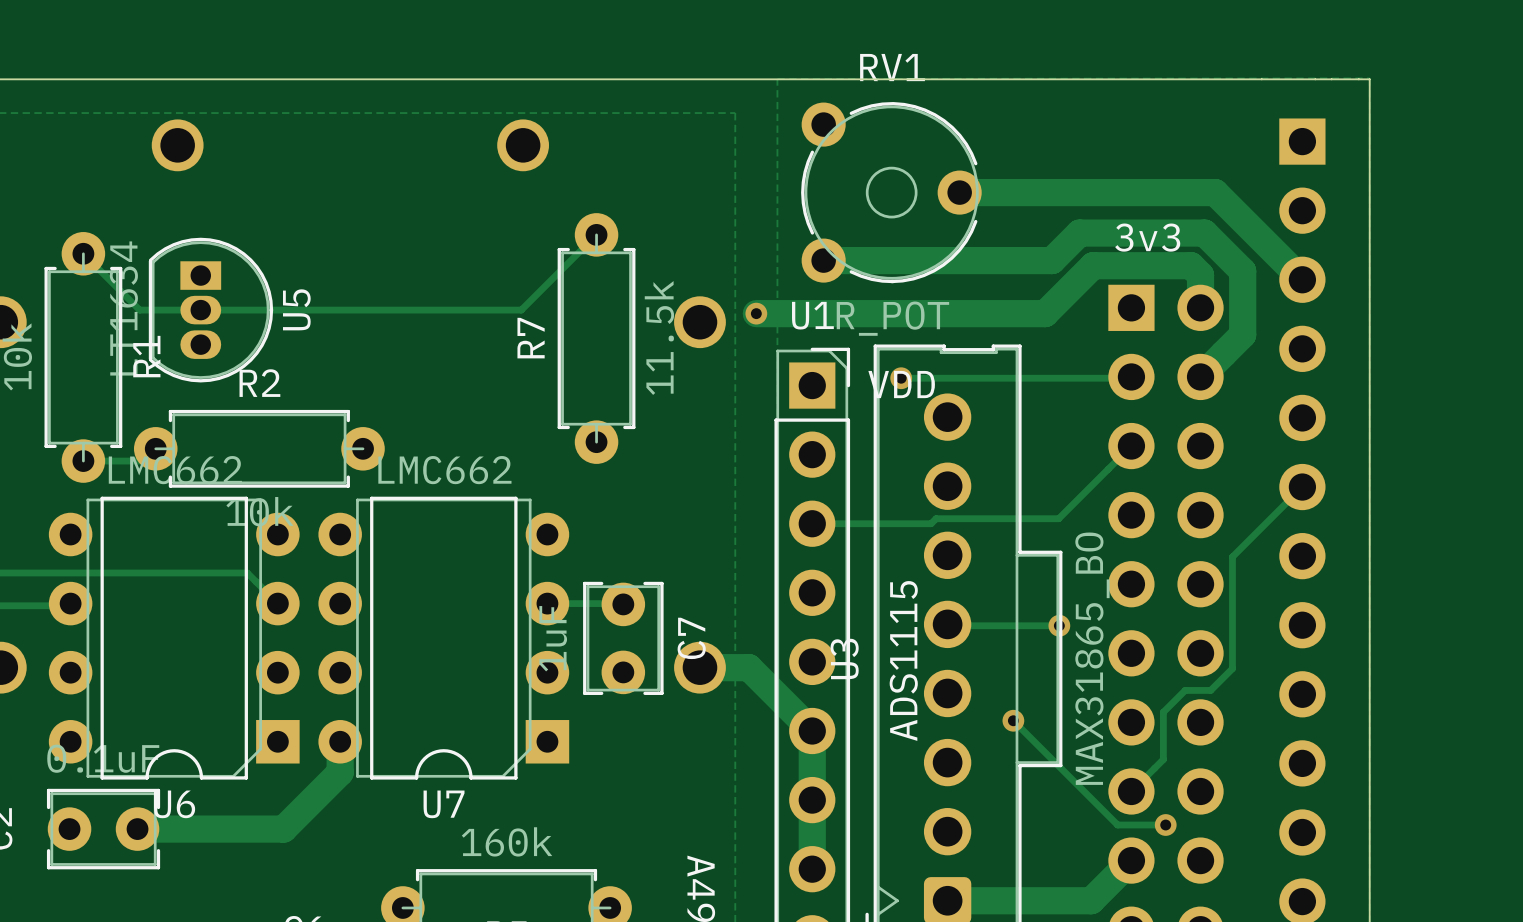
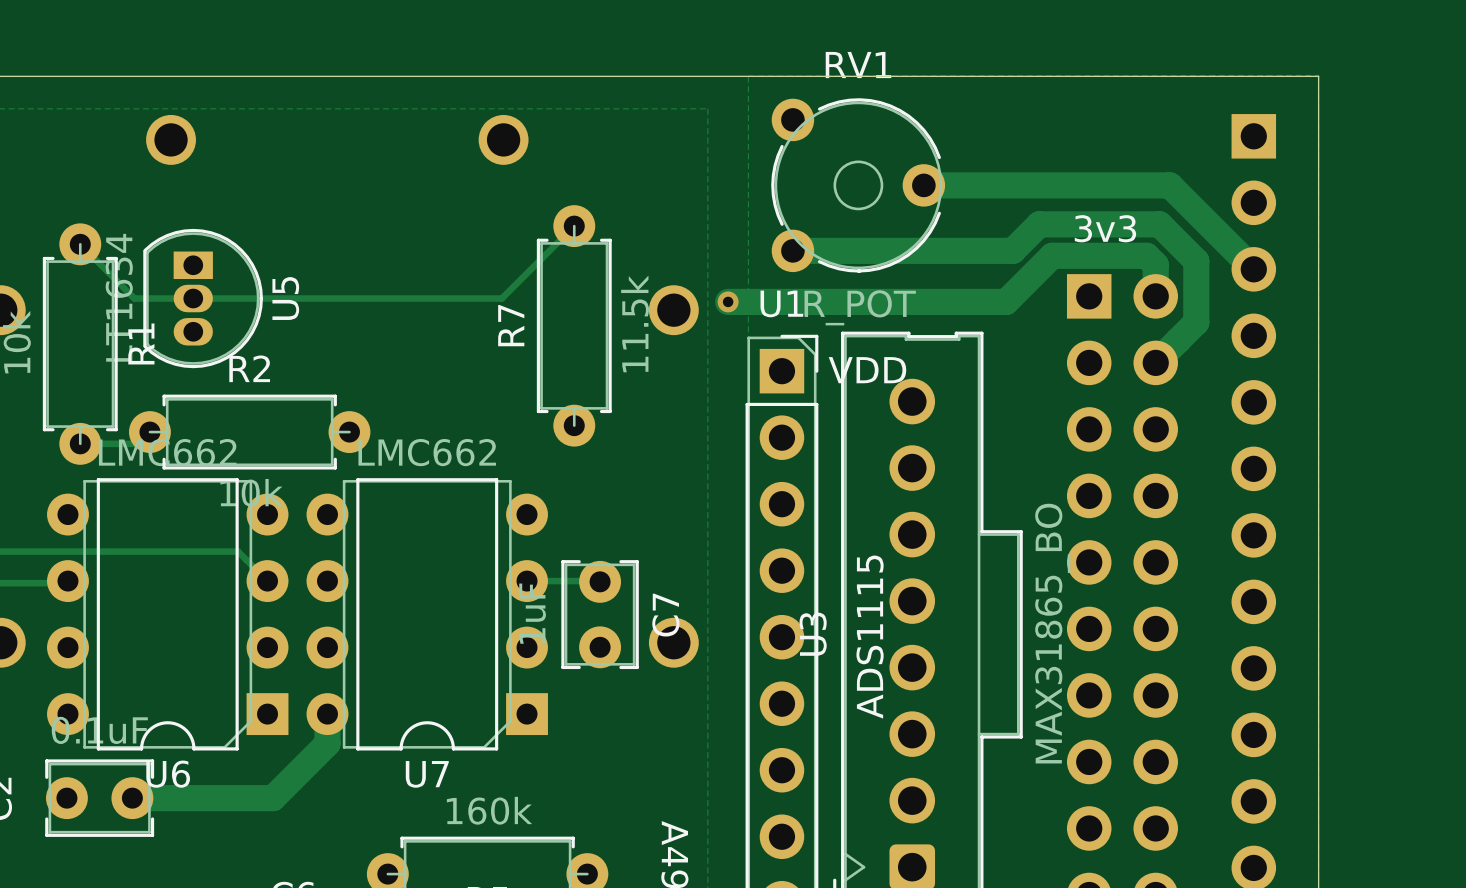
track: (1131, 376) (901, 378) -> none
via: (901, 378) -> none
track: (1131, 446) (1058, 518) (936, 518) (931, 523) (812, 523) -> none
track: (1302, 487) (1232, 556) (1232, 668) (1210, 690) (1185, 690) (1163, 712) (1163, 759) (1131, 791) -> none
track: (947, 624) (1059, 625) -> none
via: (1059, 625) -> none
track: (699, 667) (748, 667) (812, 731) (812, 869) -> none
track: (1013, 720) (1117, 825) (1165, 825) -> none
via: (1013, 720) -> none
via: (1165, 825) -> none
track: (1131, 860) (1091, 900) (947, 900) -> none

